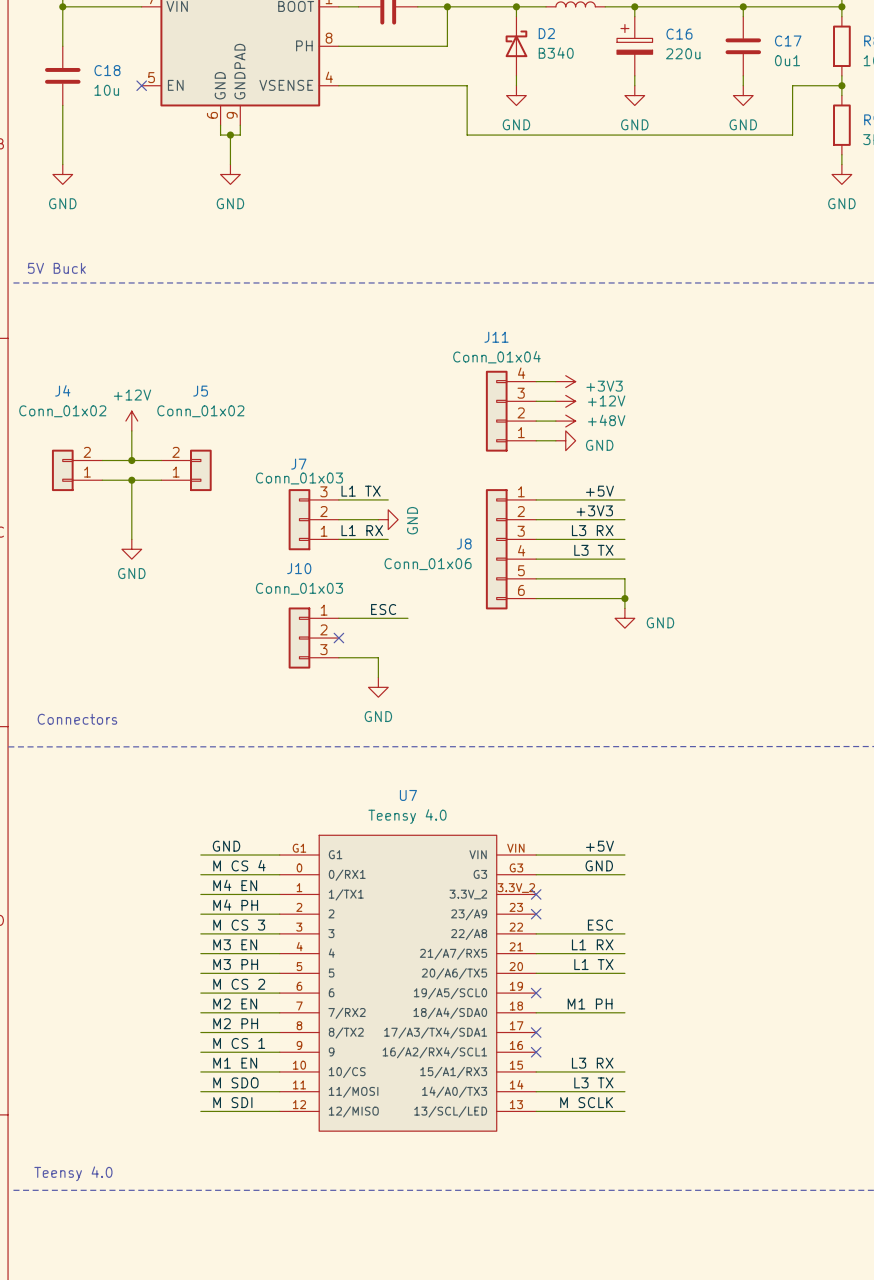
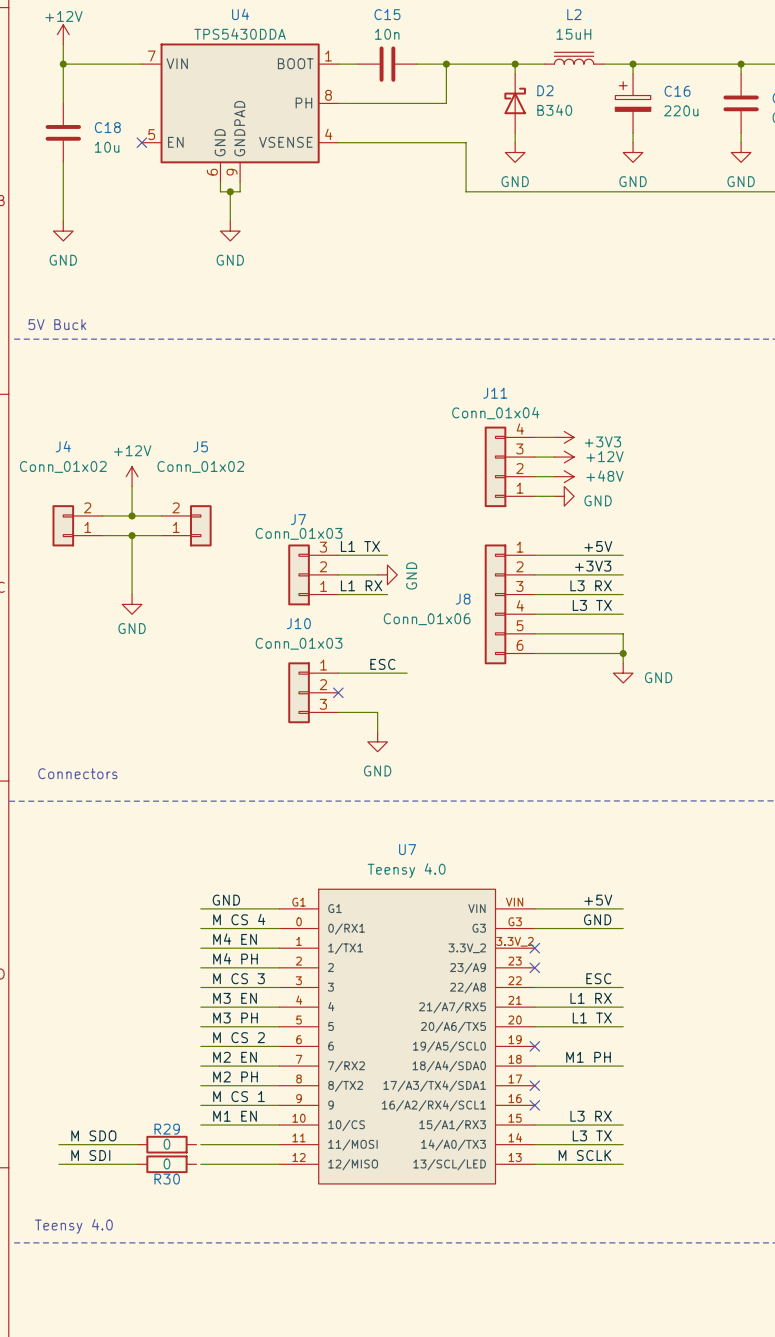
label position: M SDO (235, 1082) -> M SDO (93, 1135)
wire: none -> (58, 1144) (137, 1144)
R29: none -> 0 (166, 1144)
label position: M SDI (232, 1102) -> M SDI (90, 1155)
wire: none -> (58, 1164) (137, 1164)
R30: none -> 0 (166, 1164)

